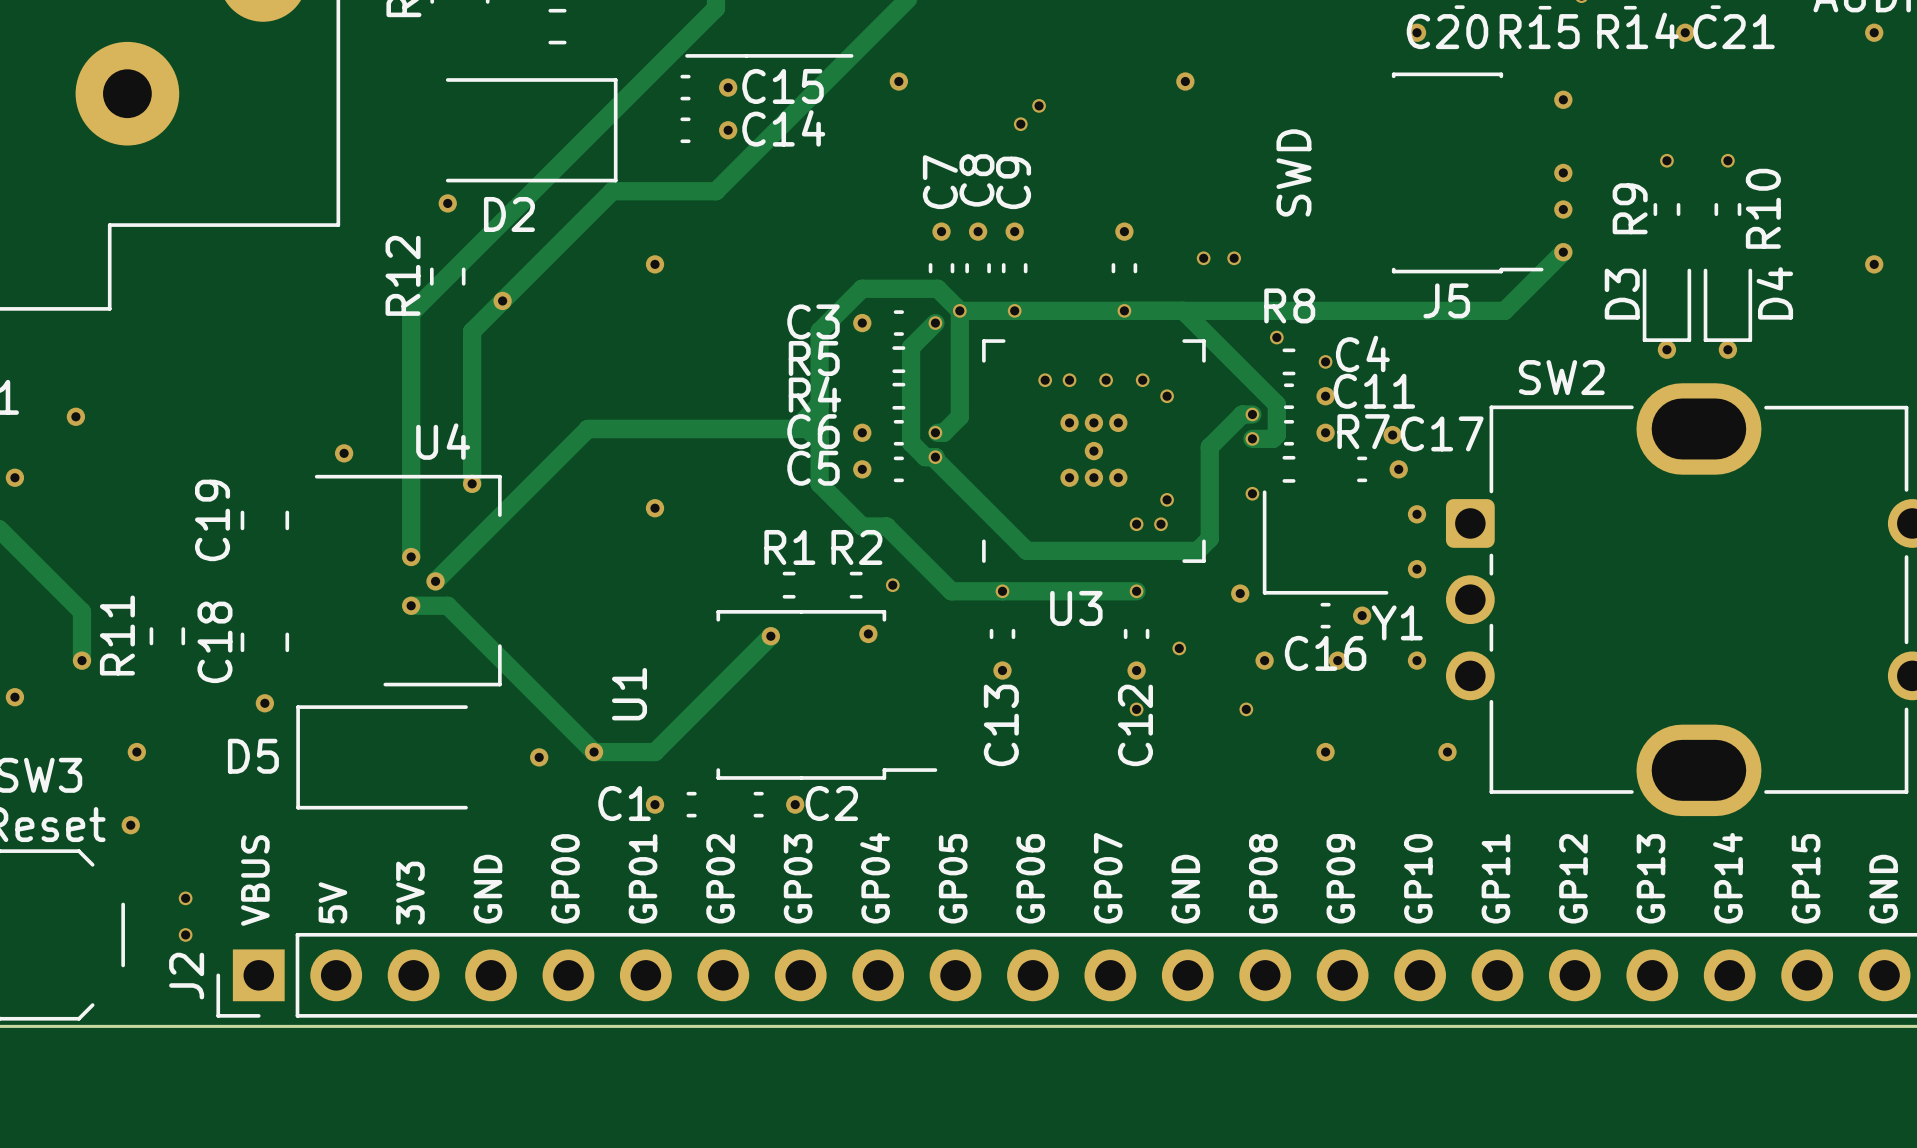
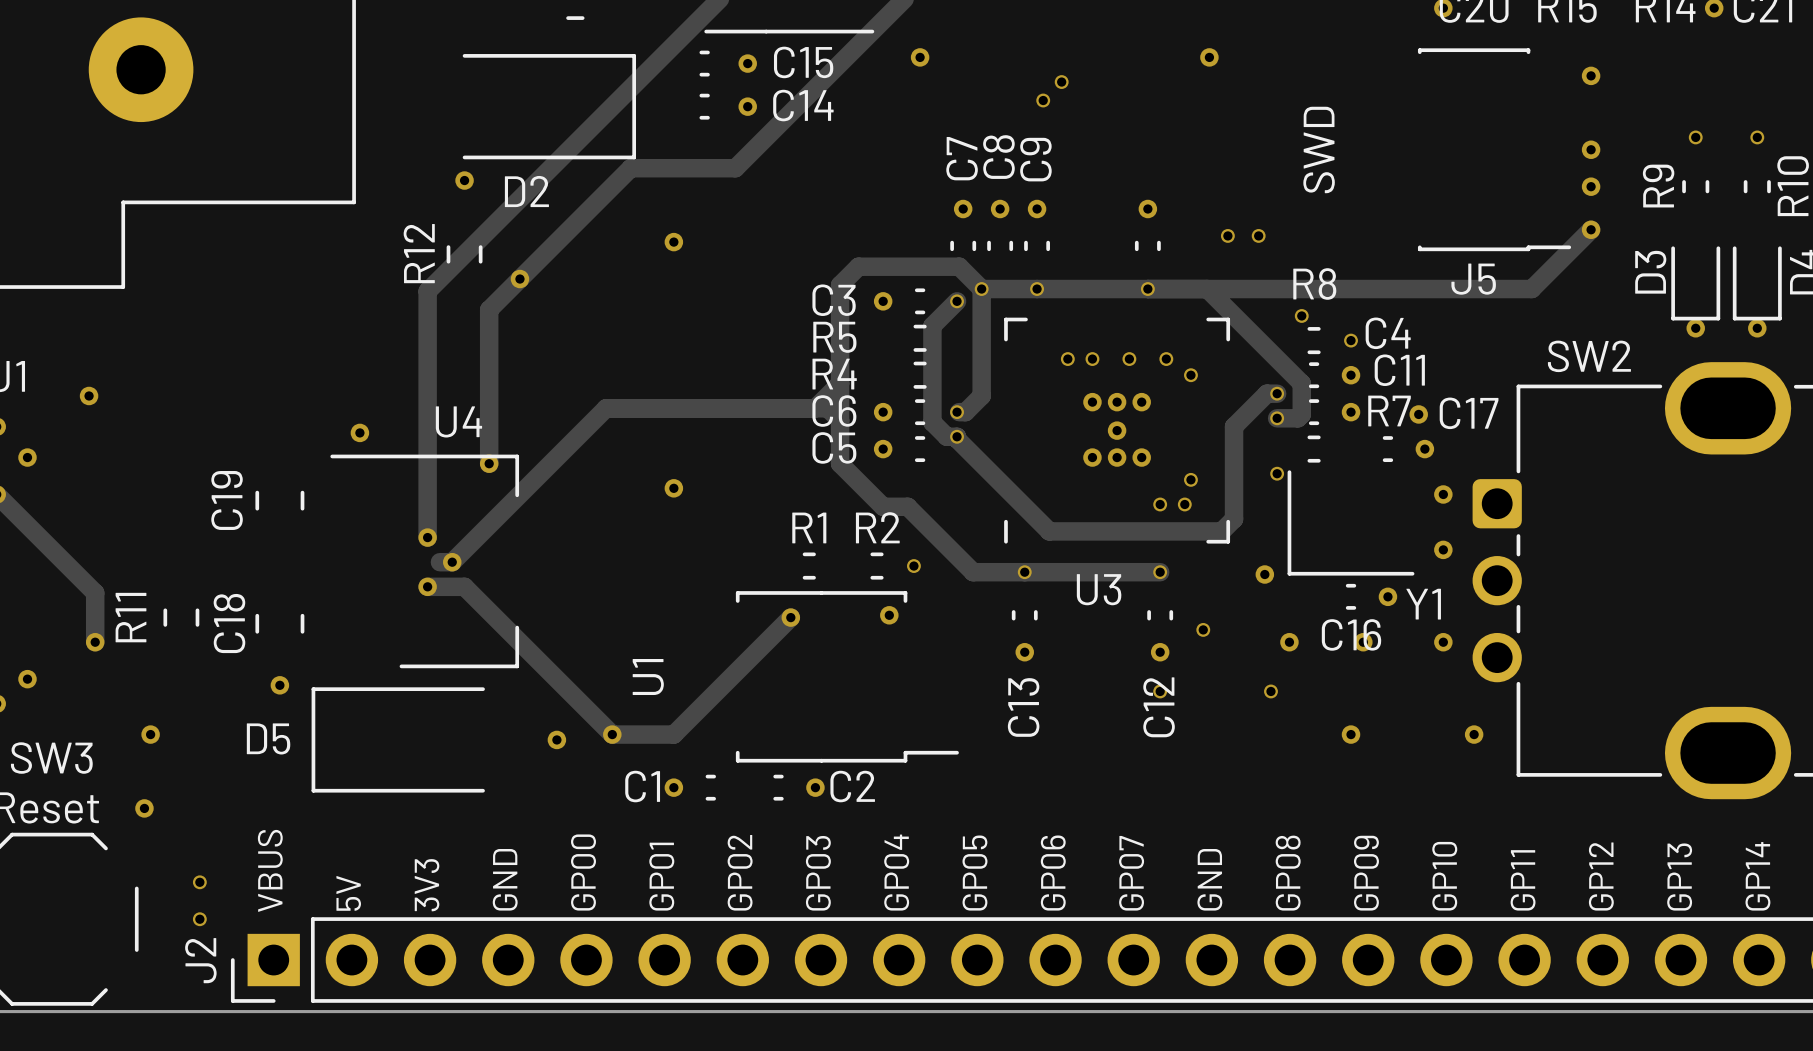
track: (862, 288) (819, 331) -> (882, 266) (858, 266) (840, 285) (840, 309)
track: none -> (439, 562) (452, 562)

